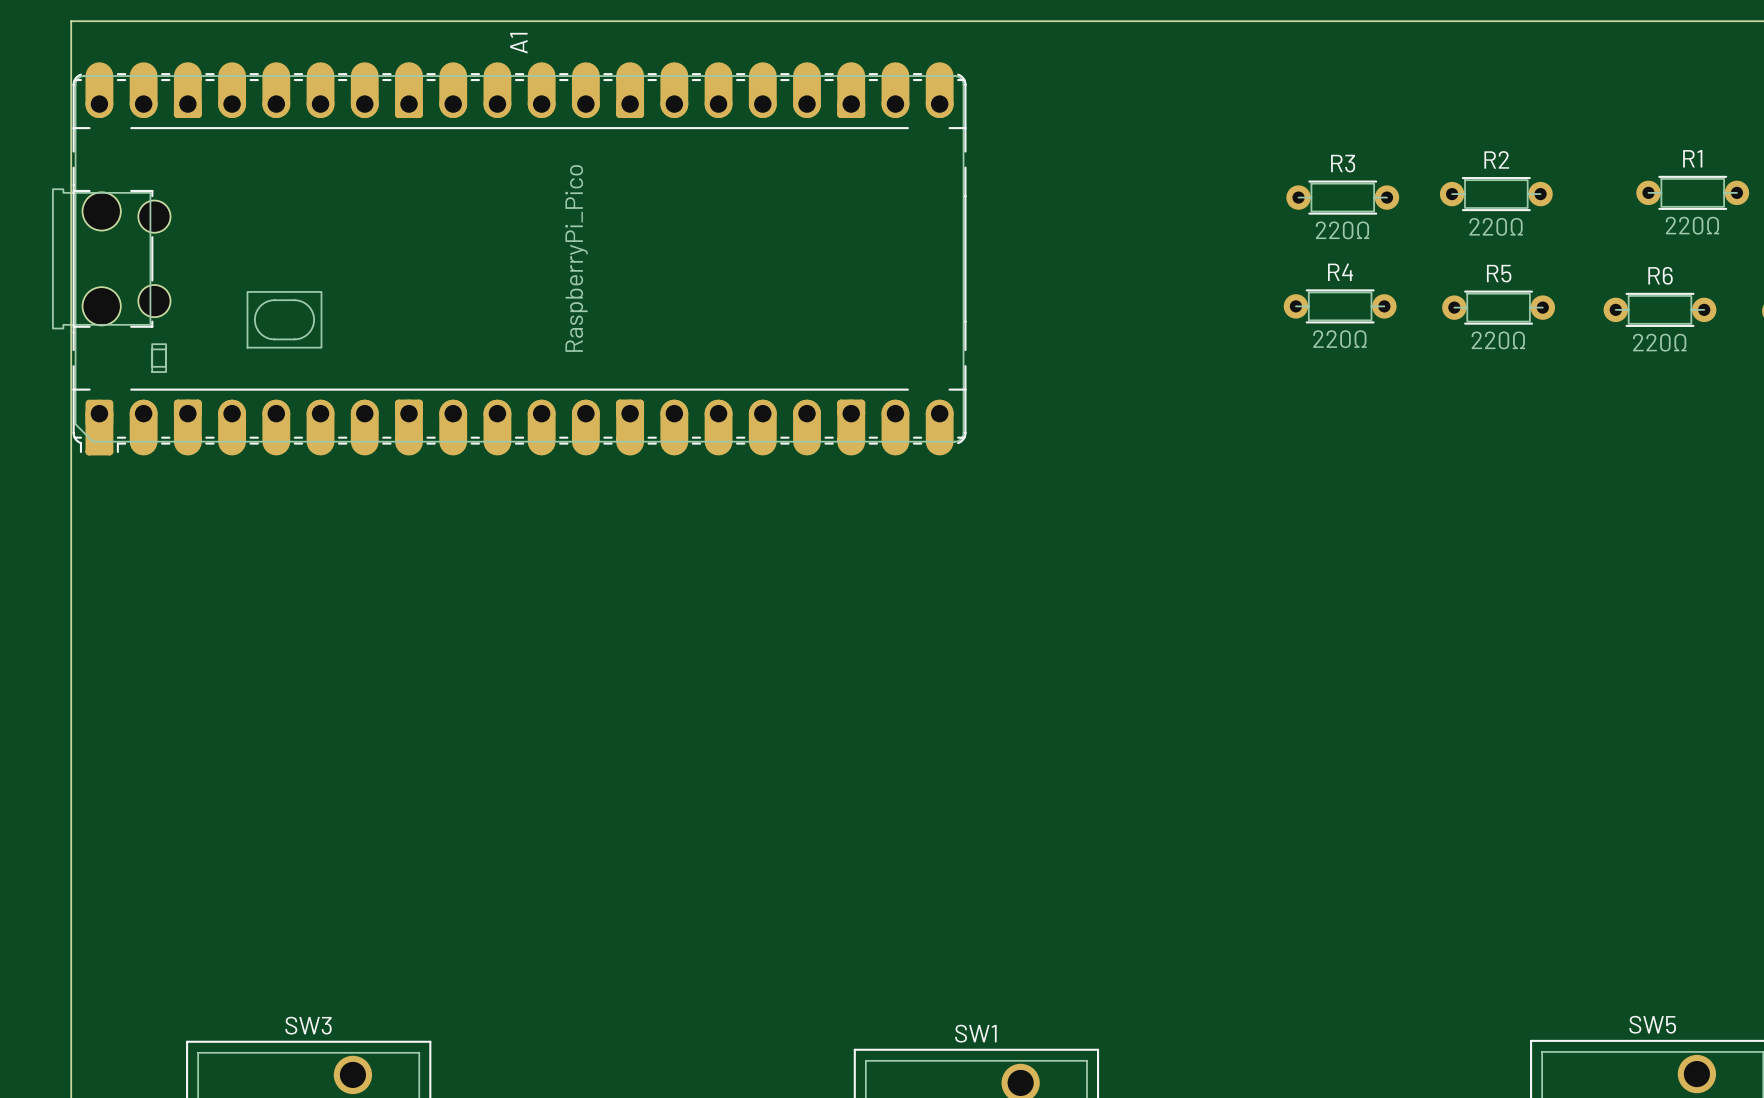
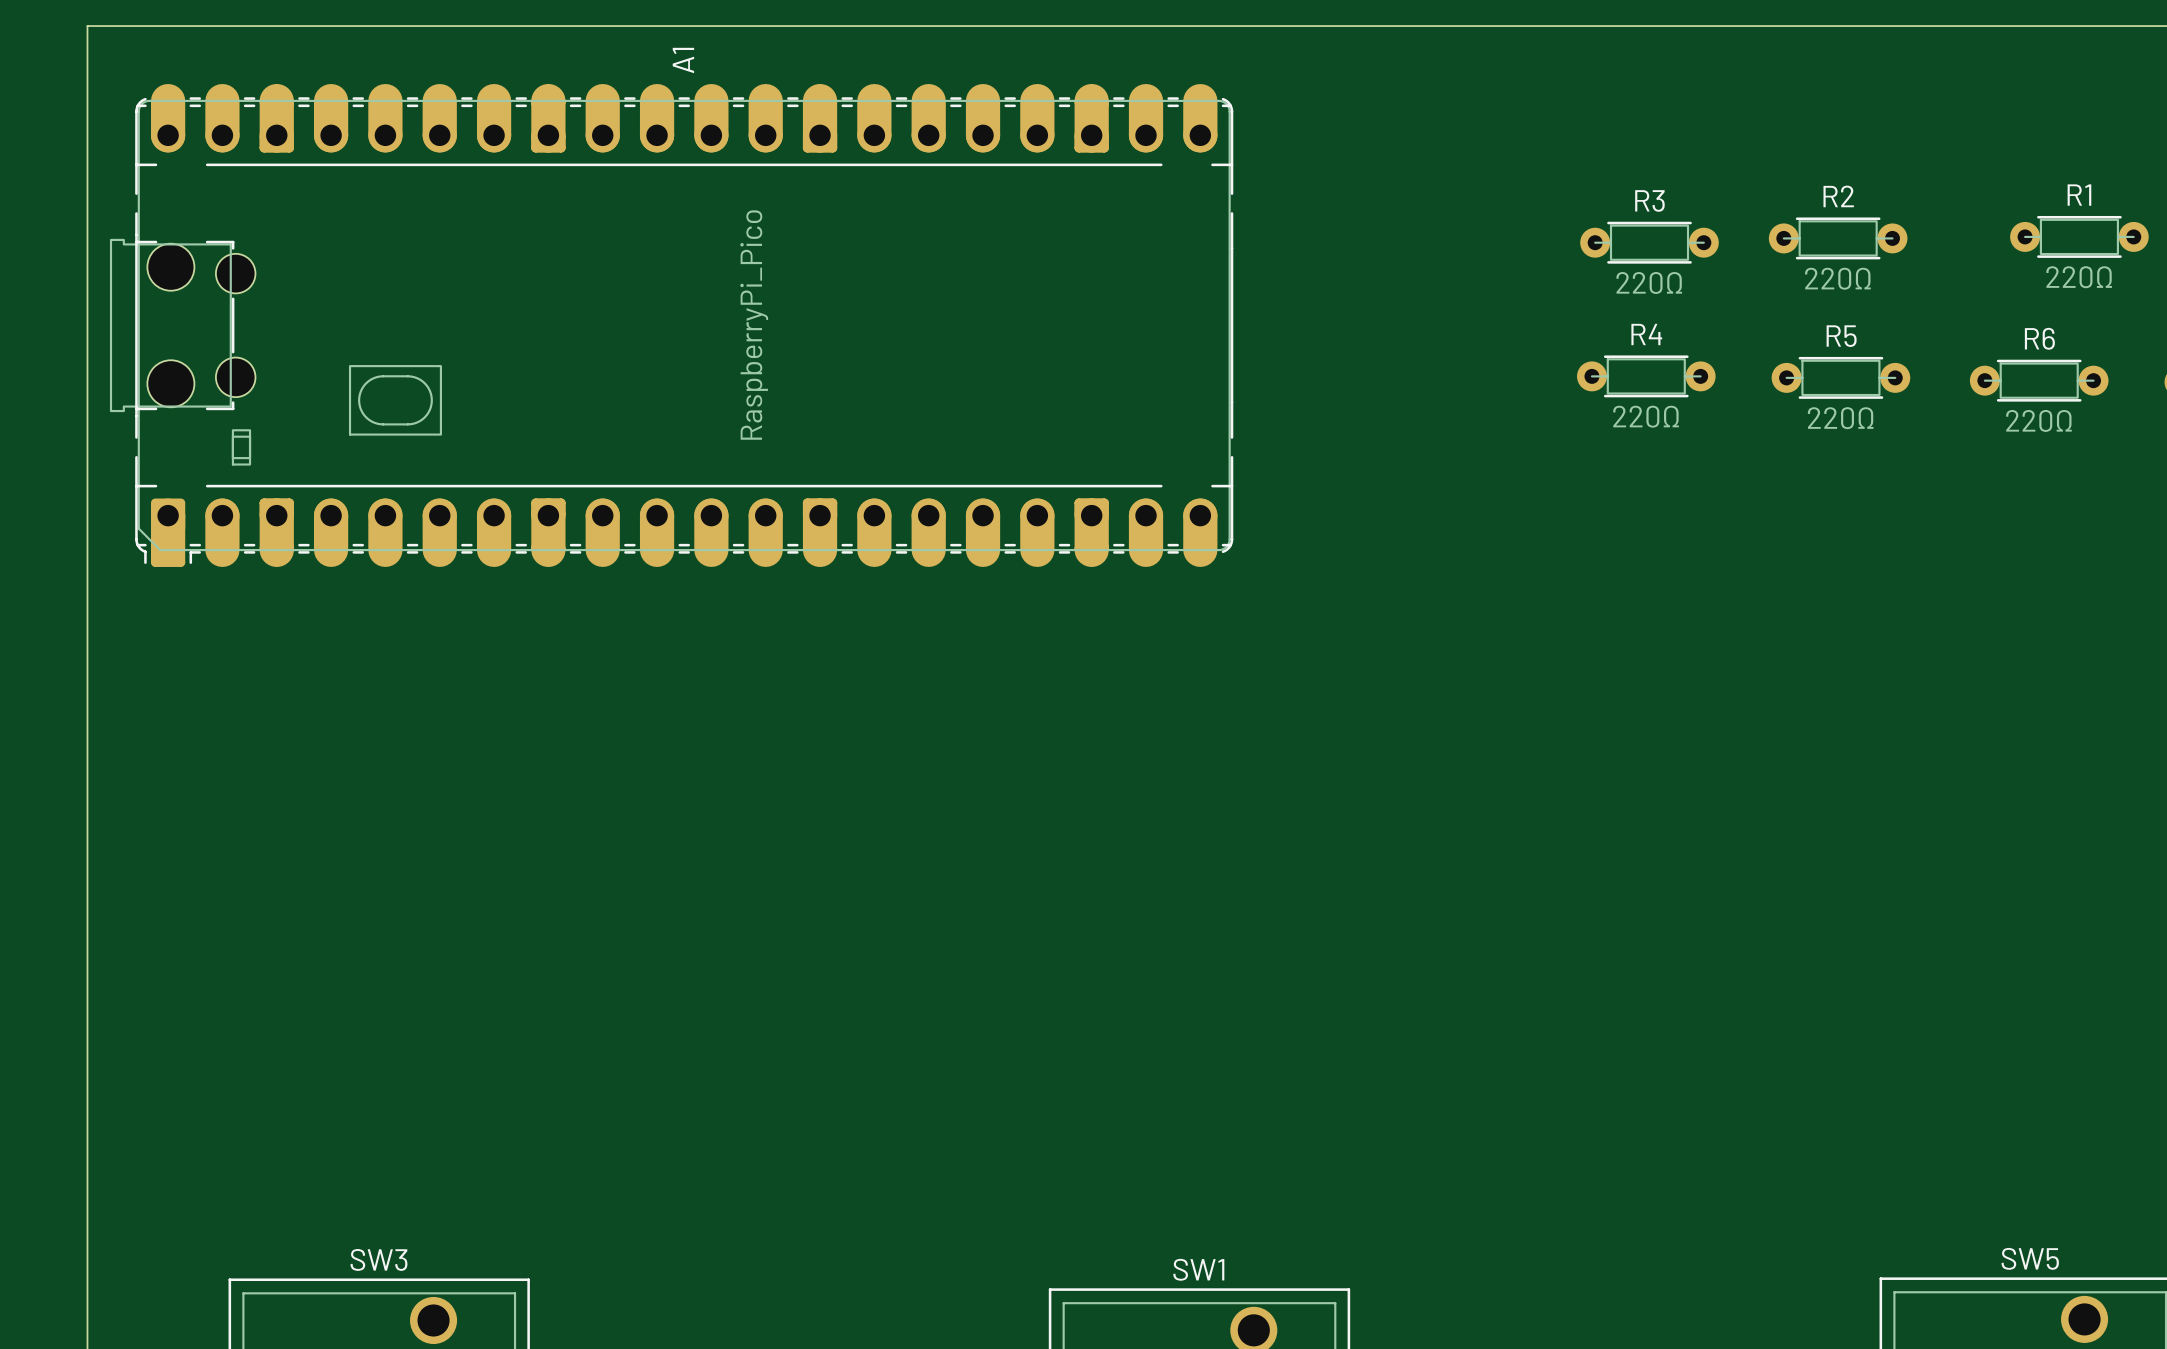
A1 position: (509, 258) -> (671, 325)

